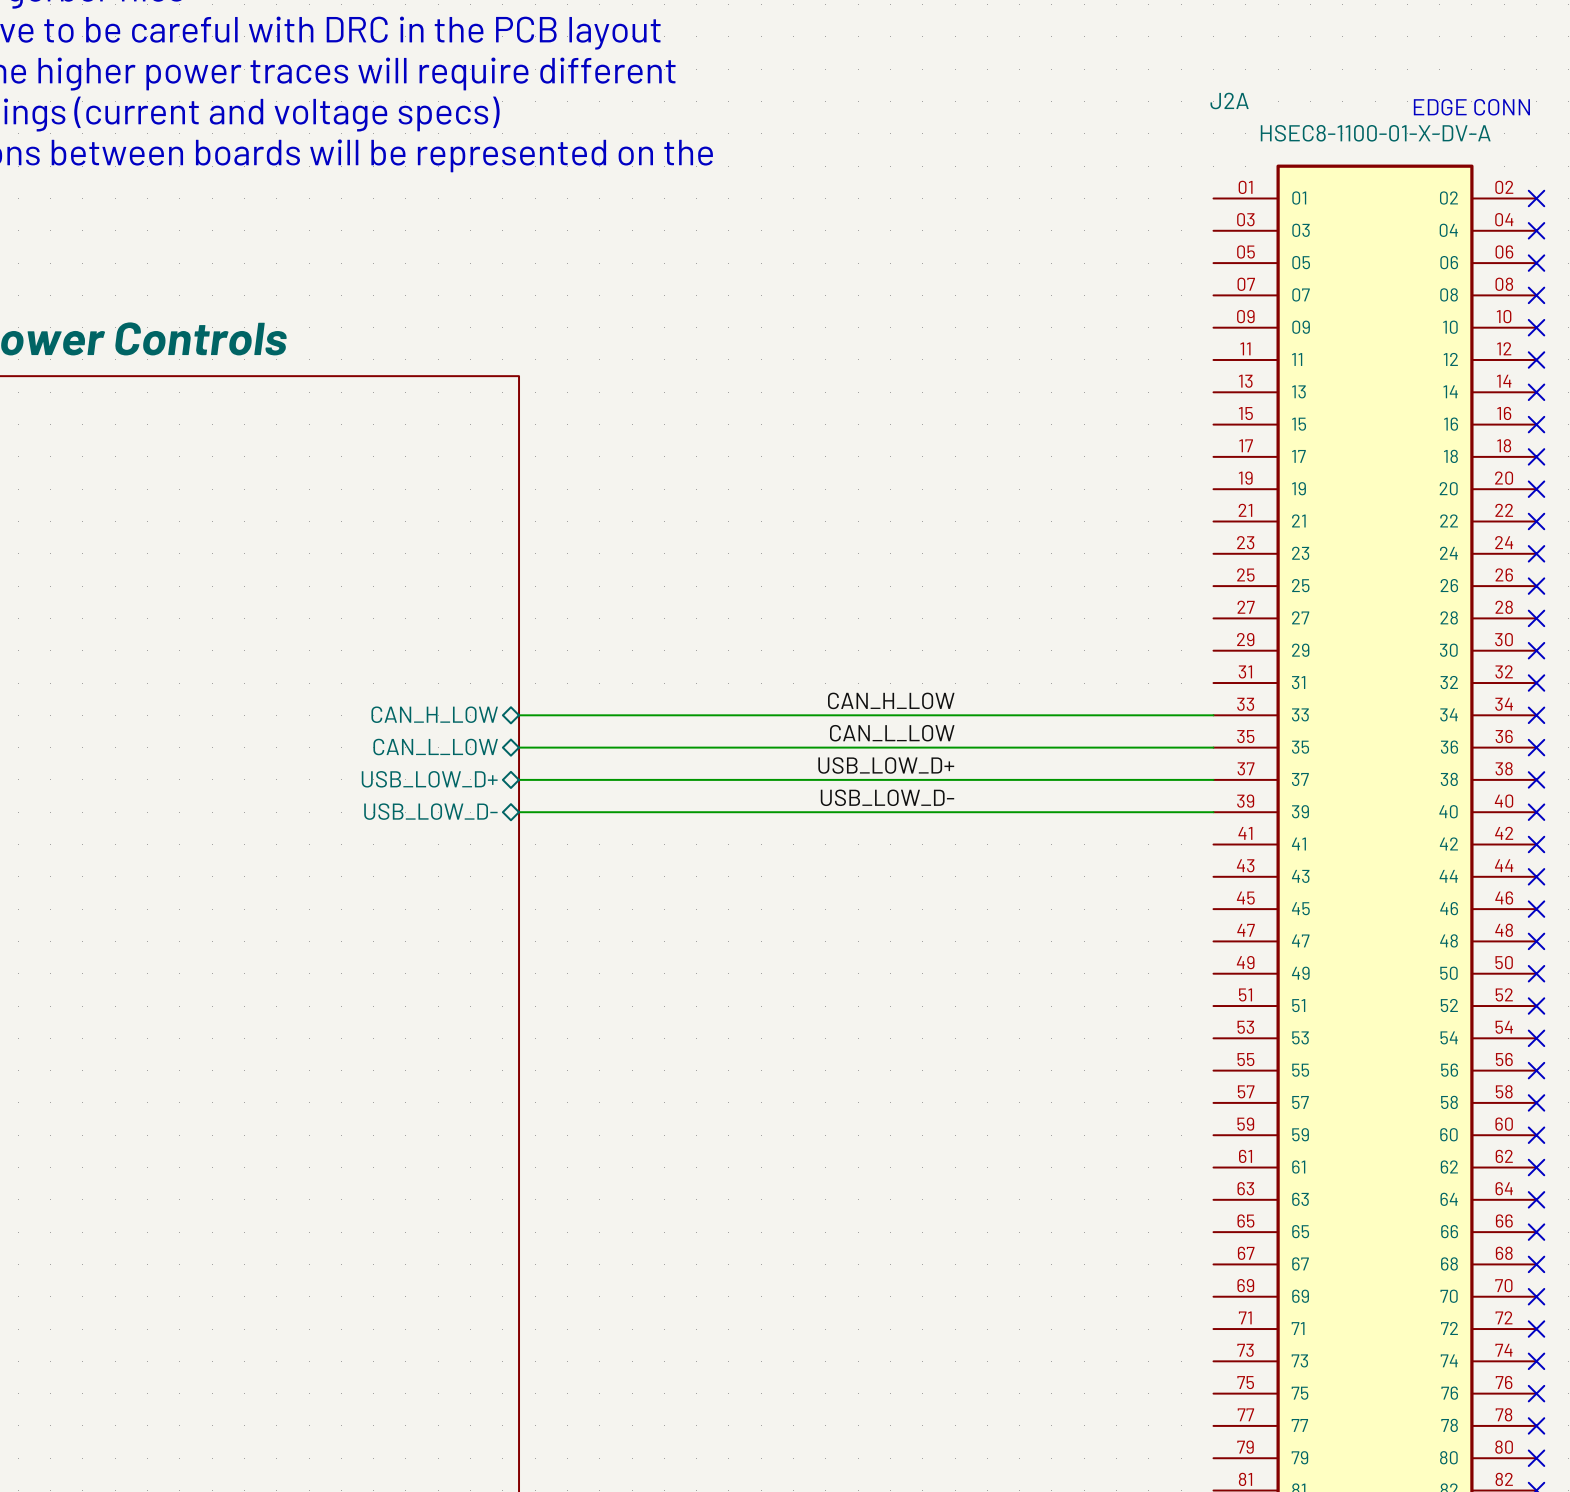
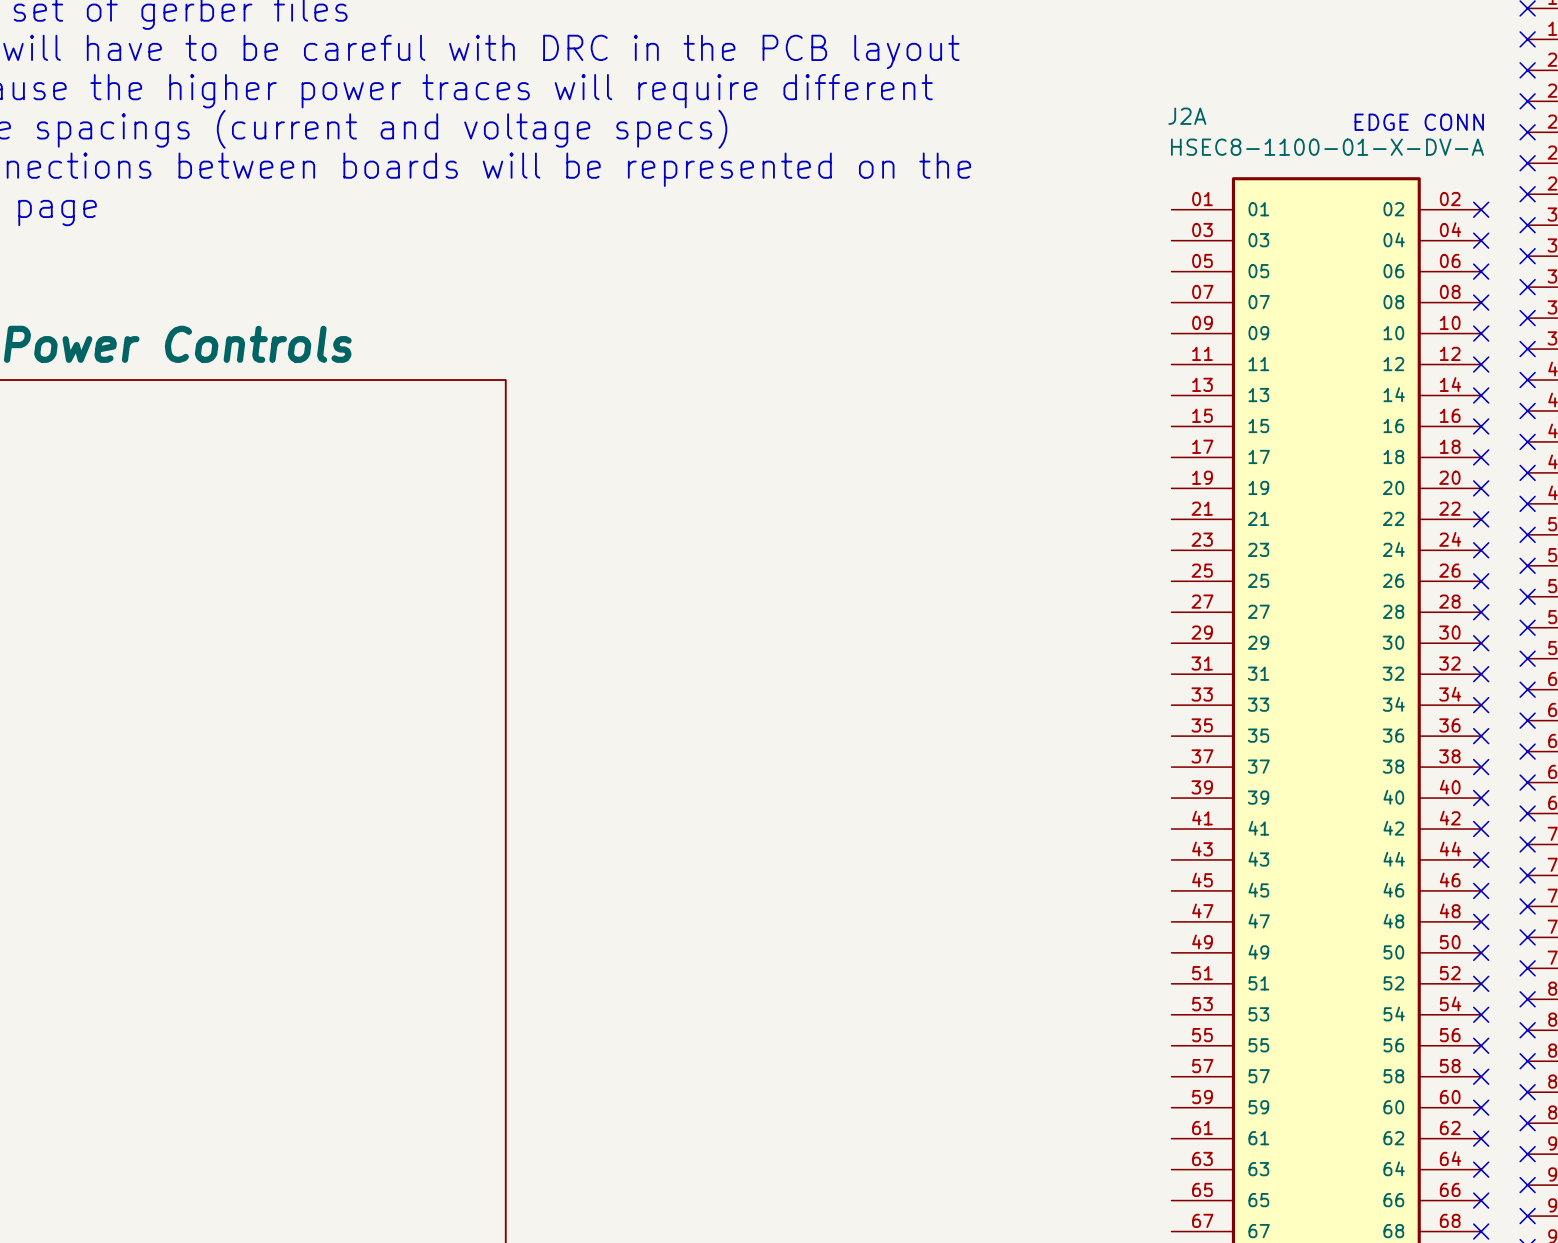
label: CAN_H_LOW (891, 700) -> none
sheet pin: CAN_H_LOW (434, 714) -> none
wire: (519, 715) (1213, 715) -> none
label: CAN_L_LOW (892, 733) -> none
sheet pin: CAN_L_LOW (435, 747) -> none
wire: (519, 747) (1213, 747) -> none
label: USB_LOW_D+ (886, 765) -> none
sheet pin: USB_LOW_D+ (429, 779) -> none
wire: (519, 779) (1213, 779) -> none
label: USB_LOW_D- (887, 797) -> none
sheet pin: USB_LOW_D- (430, 811) -> none
wire: (519, 812) (1213, 812) -> none

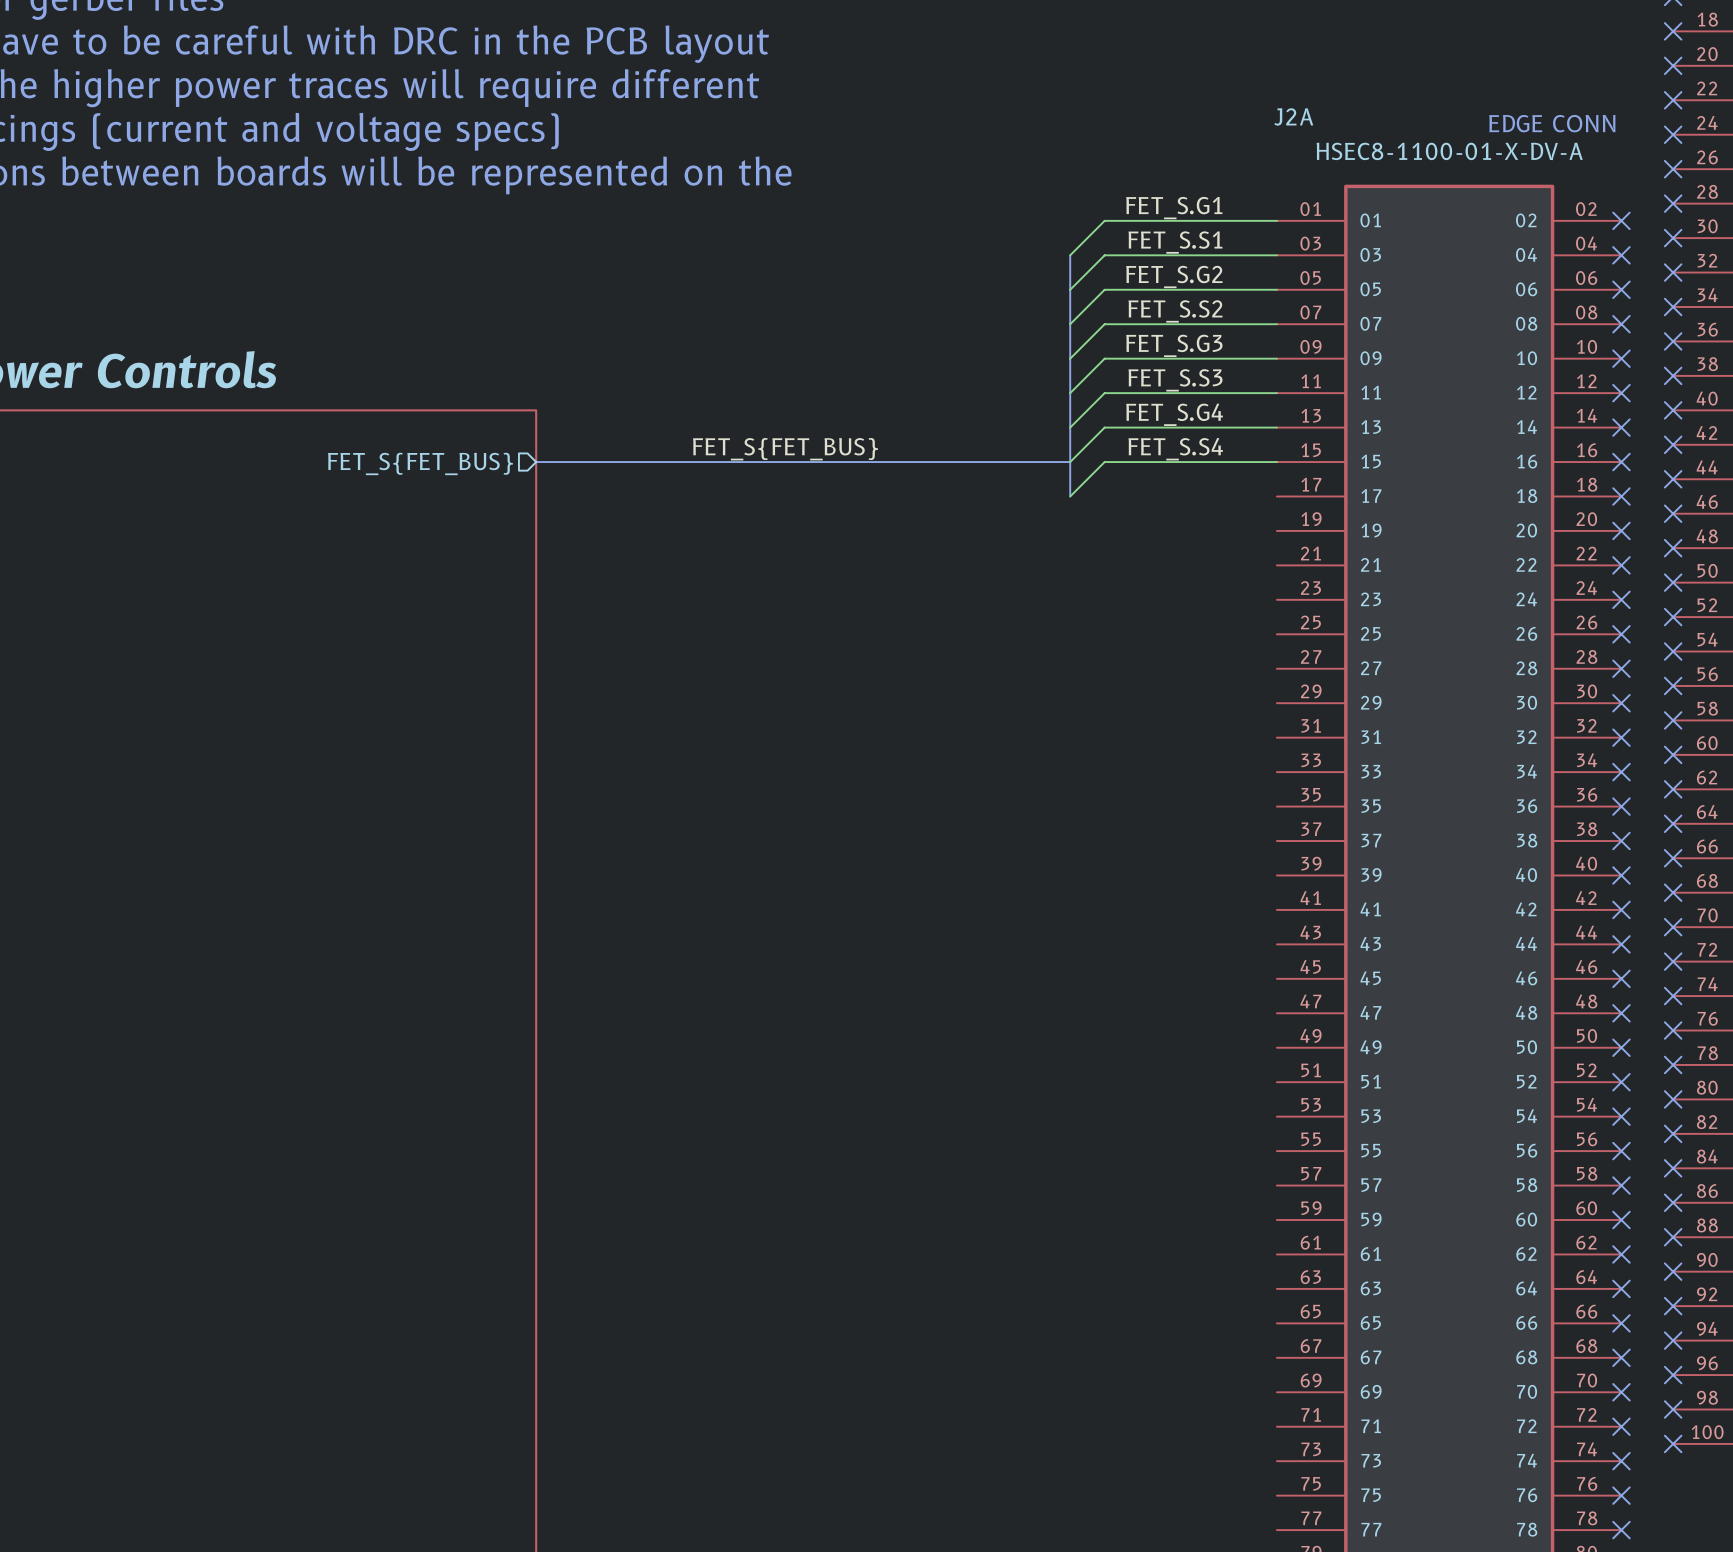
label: none -> FET_S.G1 (1174, 208)
wire: none -> (1276, 220) (1104, 220) (1070, 255)
label: none -> FET_S.S1 (1175, 242)
bus: none -> (1070, 255) (1070, 496)
wire: none -> (1276, 255) (1104, 255) (1070, 289)
label: none -> FET_S.G2 (1174, 276)
wire: none -> (1276, 289) (1104, 289) (1070, 324)
label: none -> FET_S.S2 (1175, 311)
wire: none -> (1276, 324) (1104, 324) (1070, 358)
label: none -> FET_S.G3 (1174, 345)
wire: none -> (1276, 358) (1104, 358) (1070, 393)
label: none -> FET_S.S3 (1175, 380)
wire: none -> (1276, 393) (1104, 393) (1070, 427)
label: none -> FET_S.G4 (1174, 414)
wire: none -> (1276, 427) (1104, 427) (1070, 462)
label: none -> FET_S.S4 (1175, 449)
label: none -> FET_S{FET_BUS} (785, 449)
bus: none -> (536, 462) (1070, 462)
wire: none -> (1276, 462) (1104, 462) (1070, 496)
sheet pin: none -> FET_S{FET_BUS} (420, 463)

